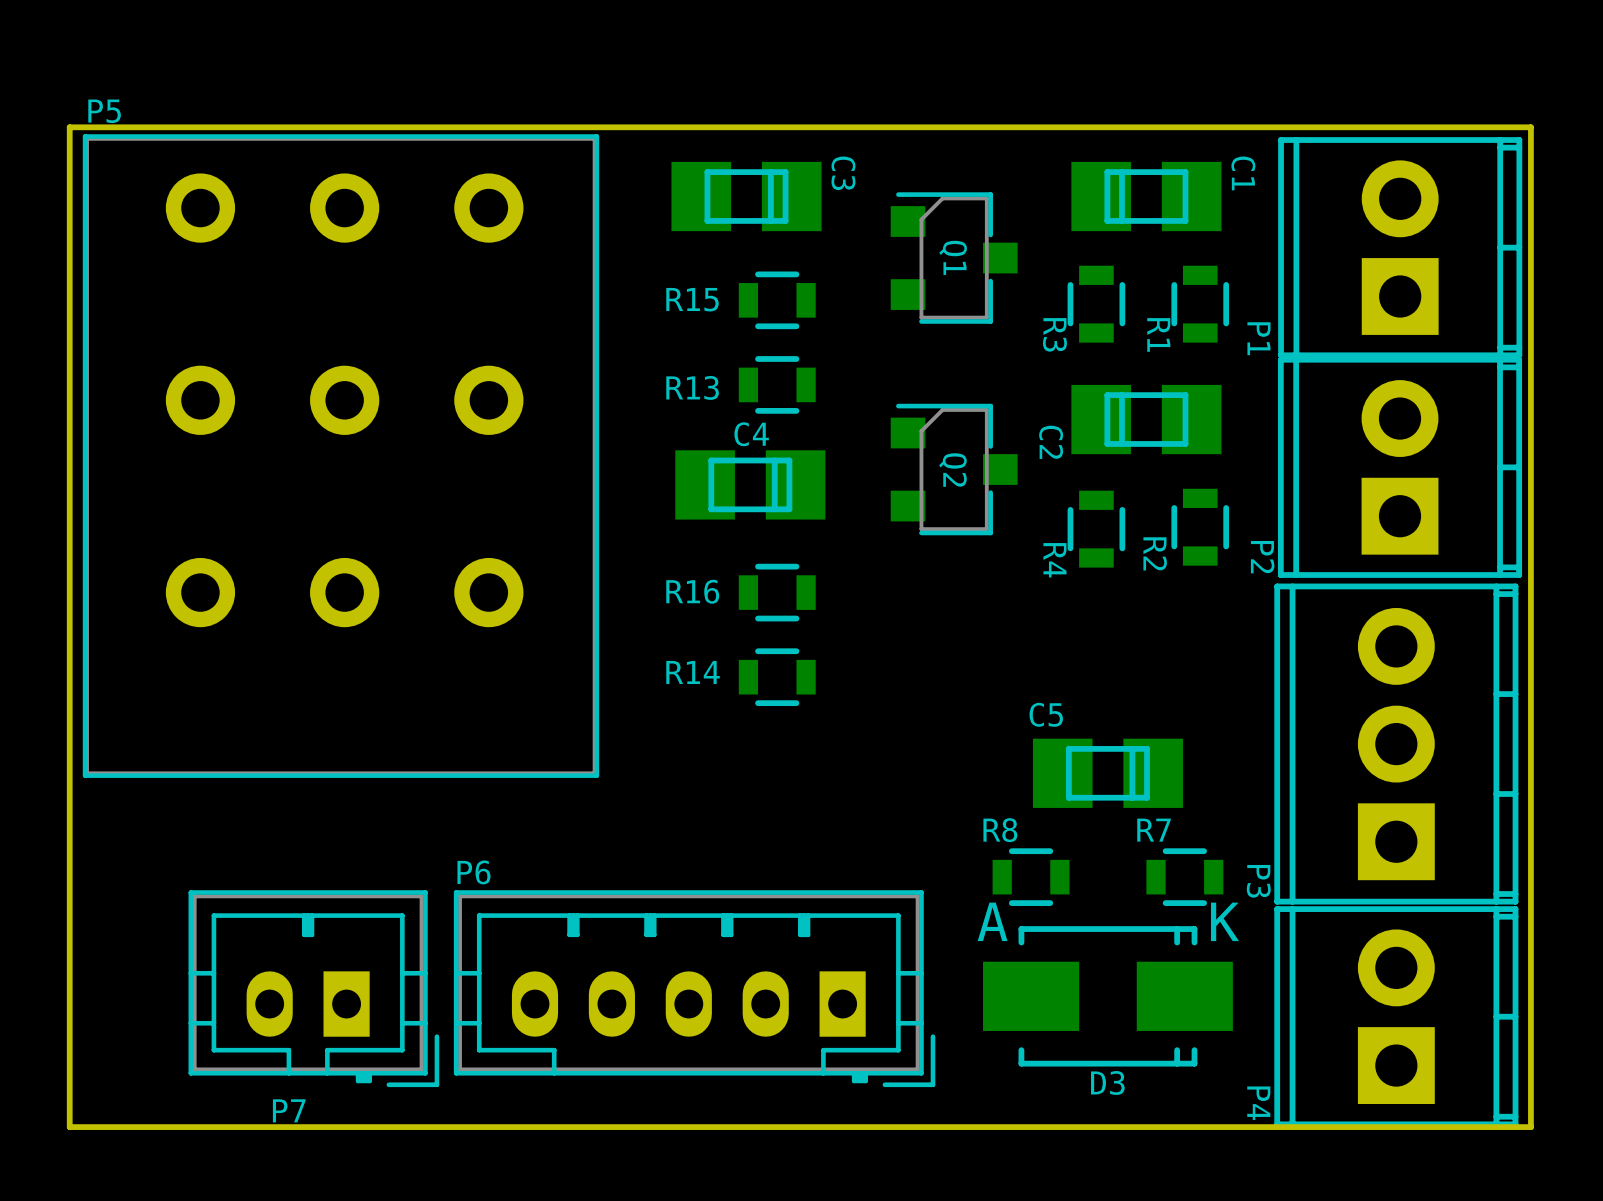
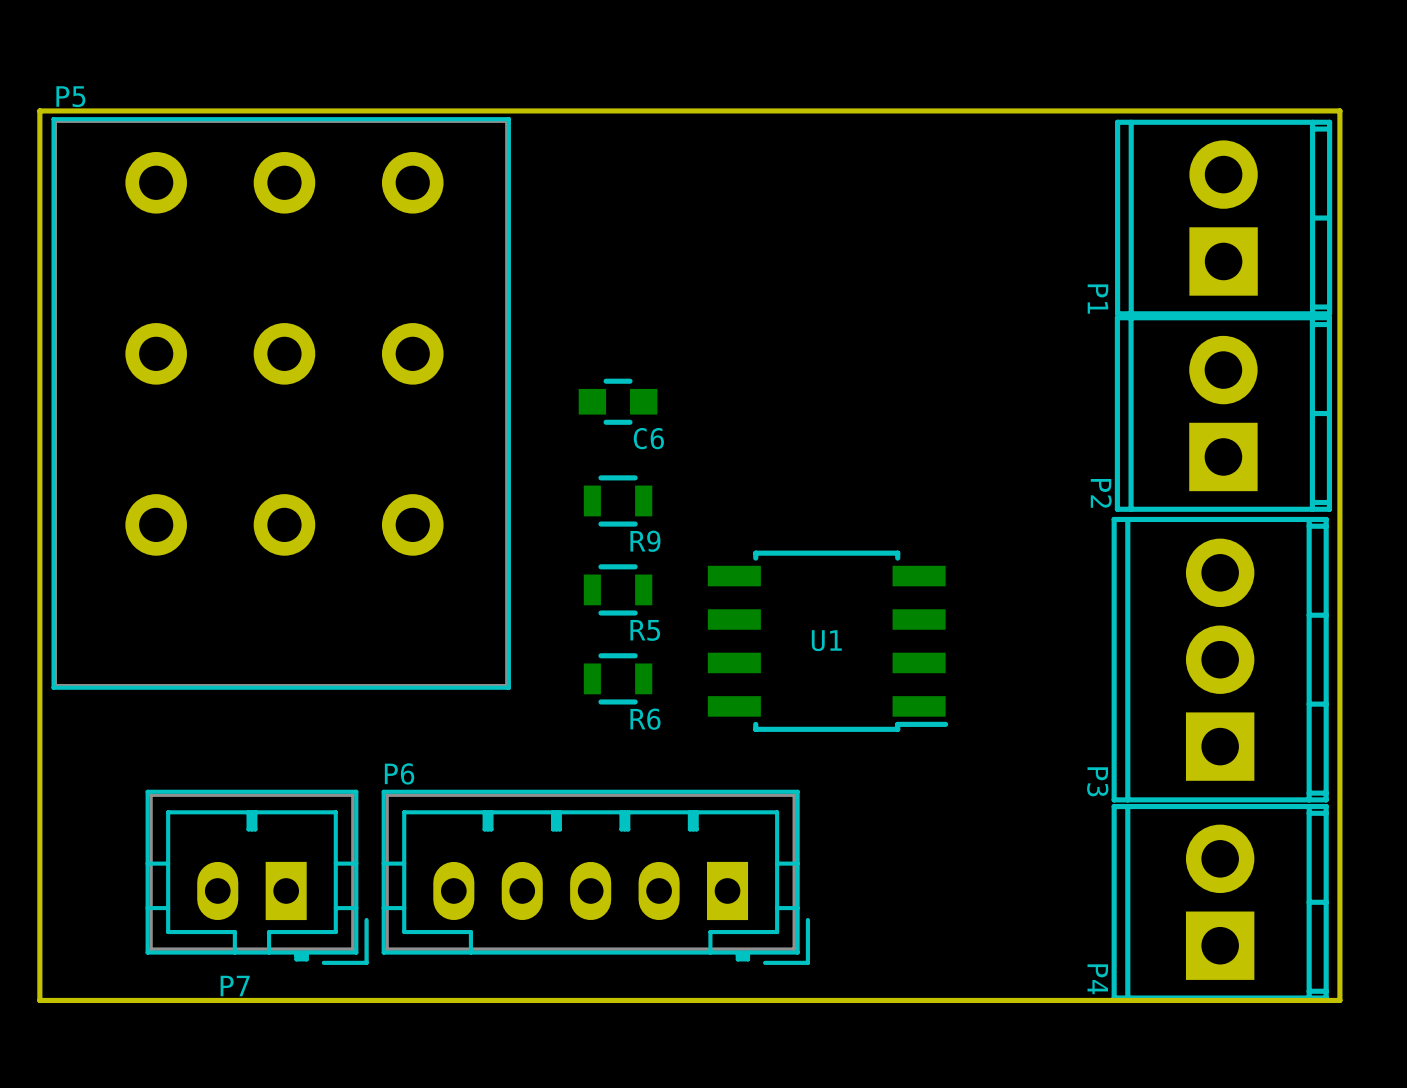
C3: (746, 196) -> none
C1: (1146, 196) -> none
Q1: (954, 258) -> none
R15: (777, 300) -> none
R3: (1096, 304) -> none
R1: (1200, 304) -> none
R13: (777, 384) -> none
C2: (1146, 419) -> none
C6: none -> (618, 401)
Q2: (954, 469) -> none
C4: (750, 484) -> none
R2: (1200, 527) -> none
R4: (1096, 529) -> none
R9: none -> (618, 500)
R16: (777, 592) -> none
R5: none -> (618, 589)
R14: (777, 677) -> none
U1: none -> (828, 641)
R6: none -> (618, 678)
C5: (1107, 773) -> none
R8: (1031, 877) -> none
R7: (1184, 877) -> none
D3: (1107, 996) -> none

